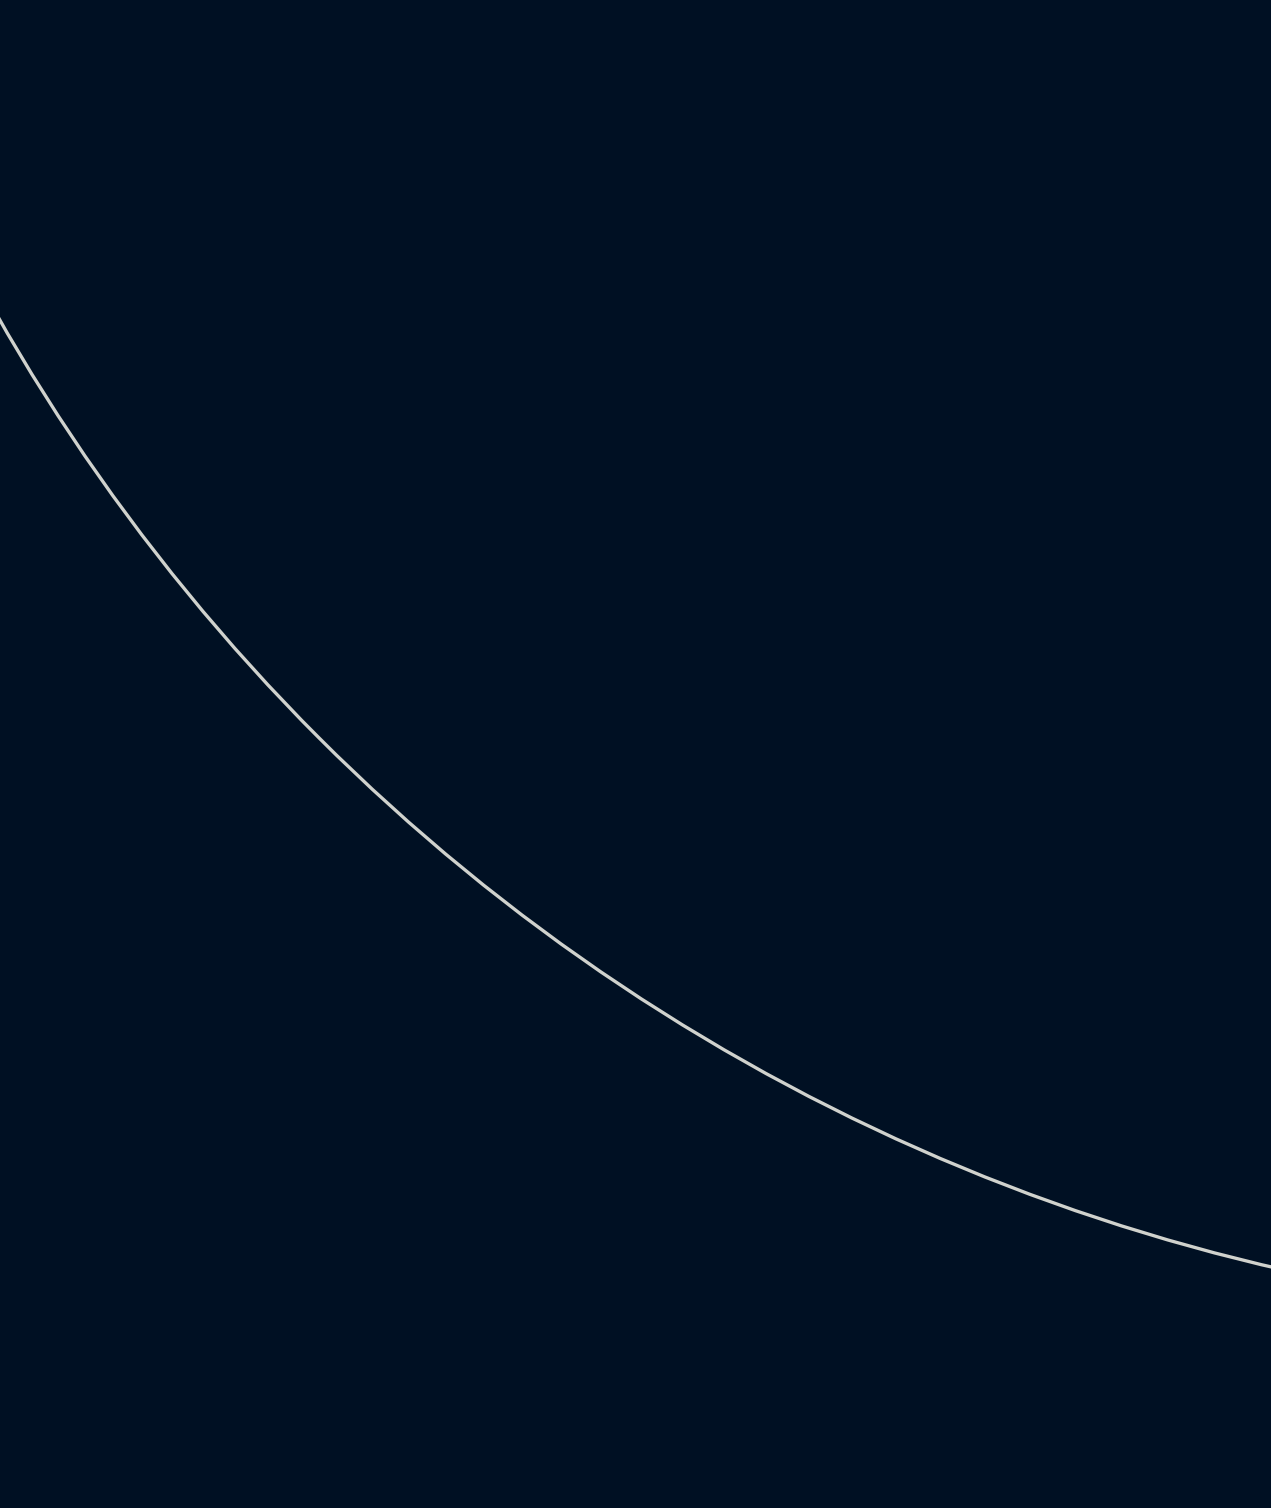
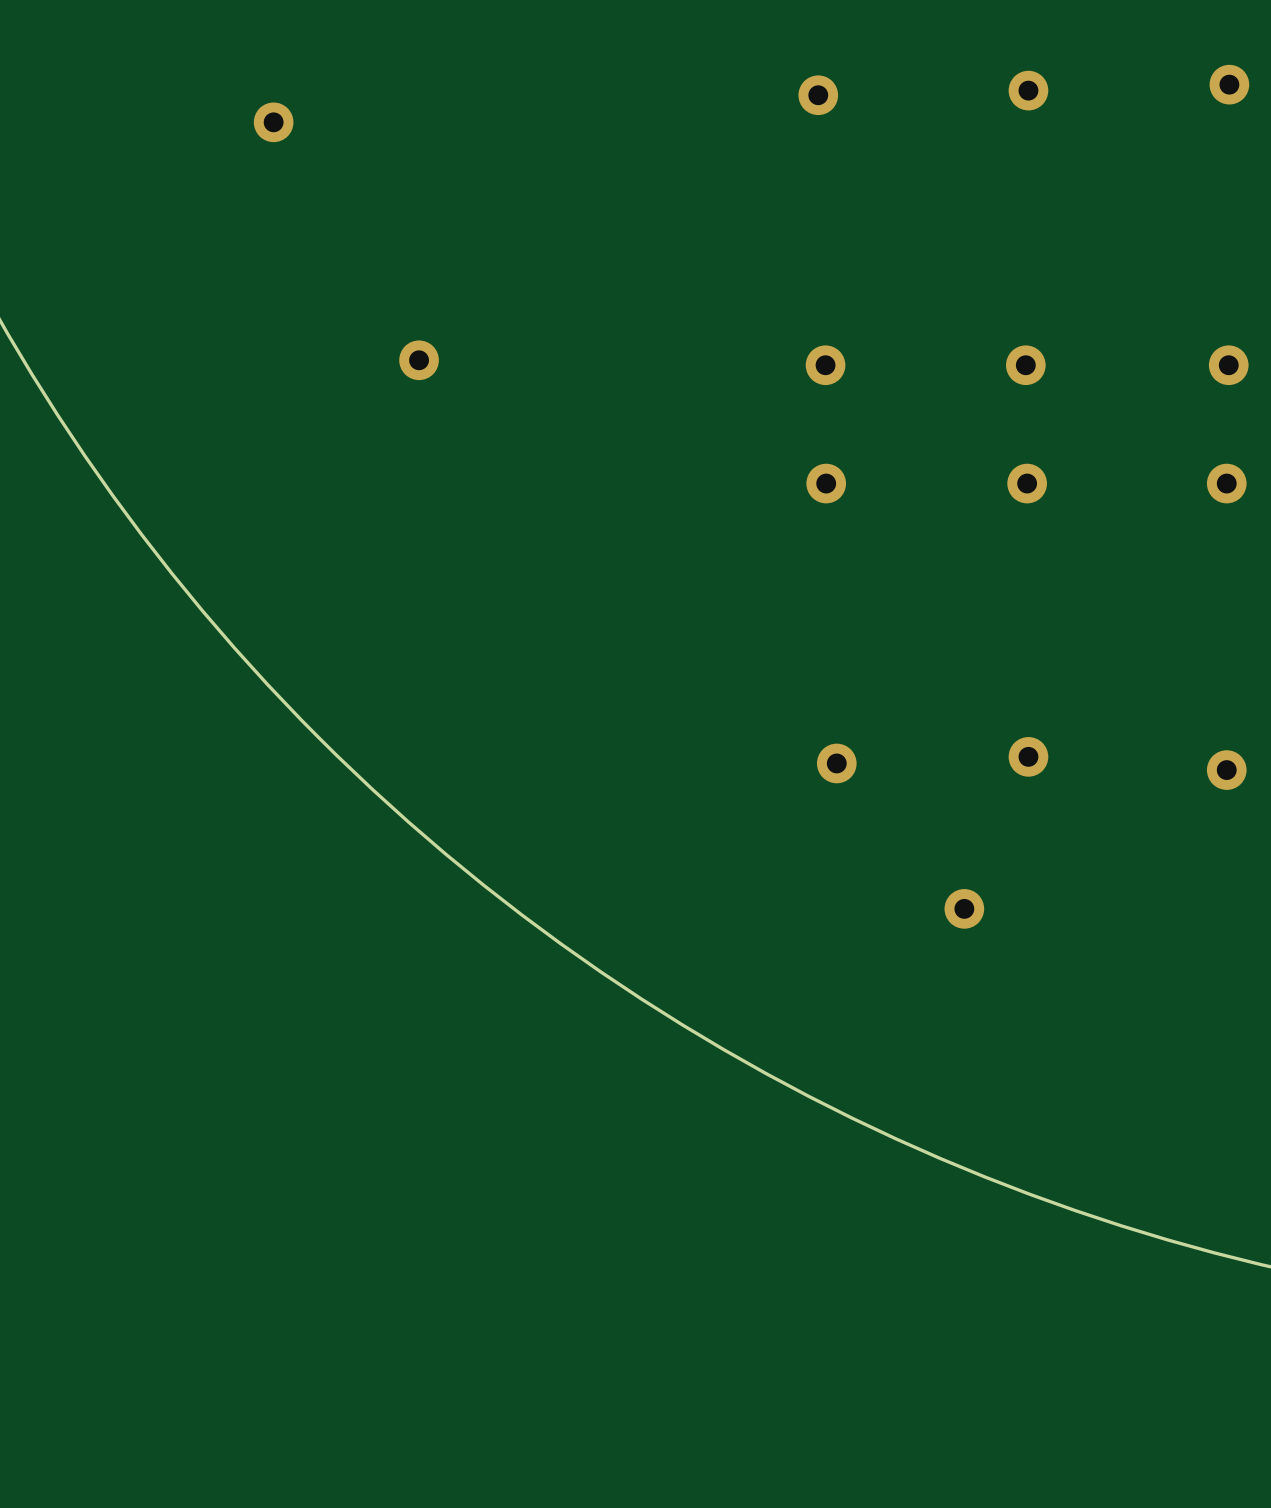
via: none -> (1229, 84)
via: none -> (1028, 90)
via: none -> (818, 95)
via: none -> (273, 122)
via: none -> (419, 360)
via: none -> (825, 365)
via: none -> (1025, 365)
via: none -> (1228, 365)
via: none -> (826, 483)
via: none -> (1027, 483)
via: none -> (1226, 483)
via: none -> (1028, 756)
via: none -> (836, 763)
via: none -> (1226, 770)
via: none -> (964, 908)

